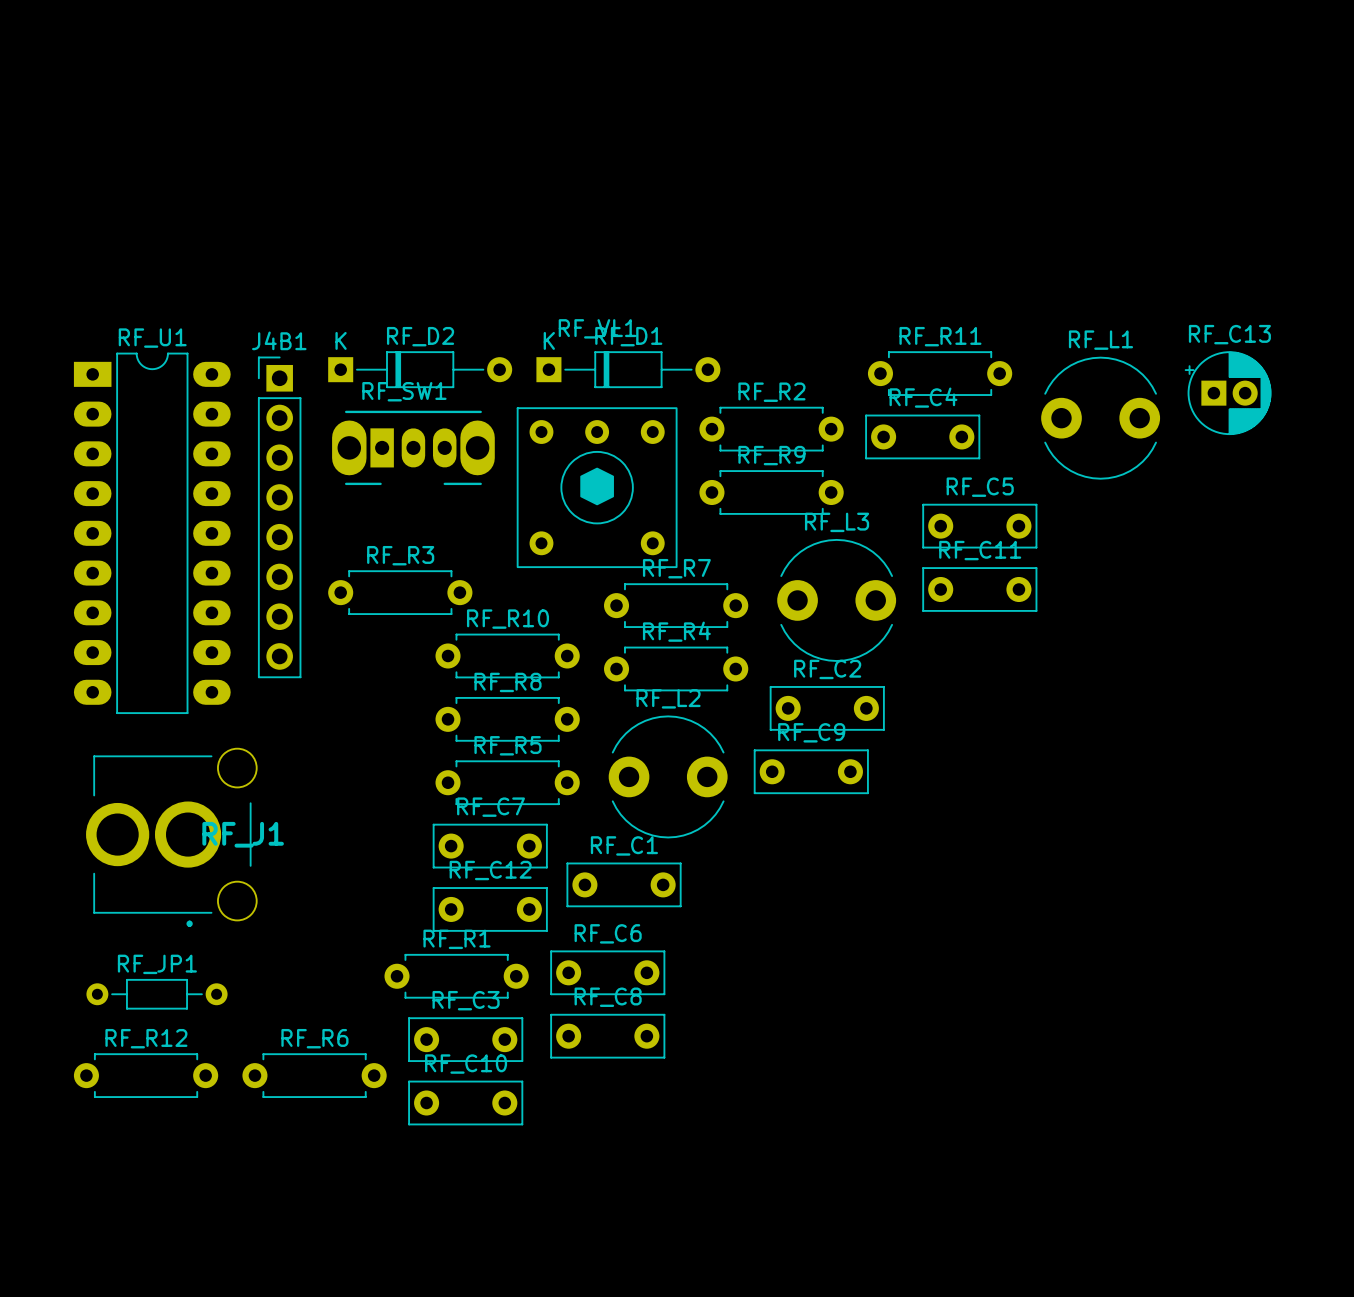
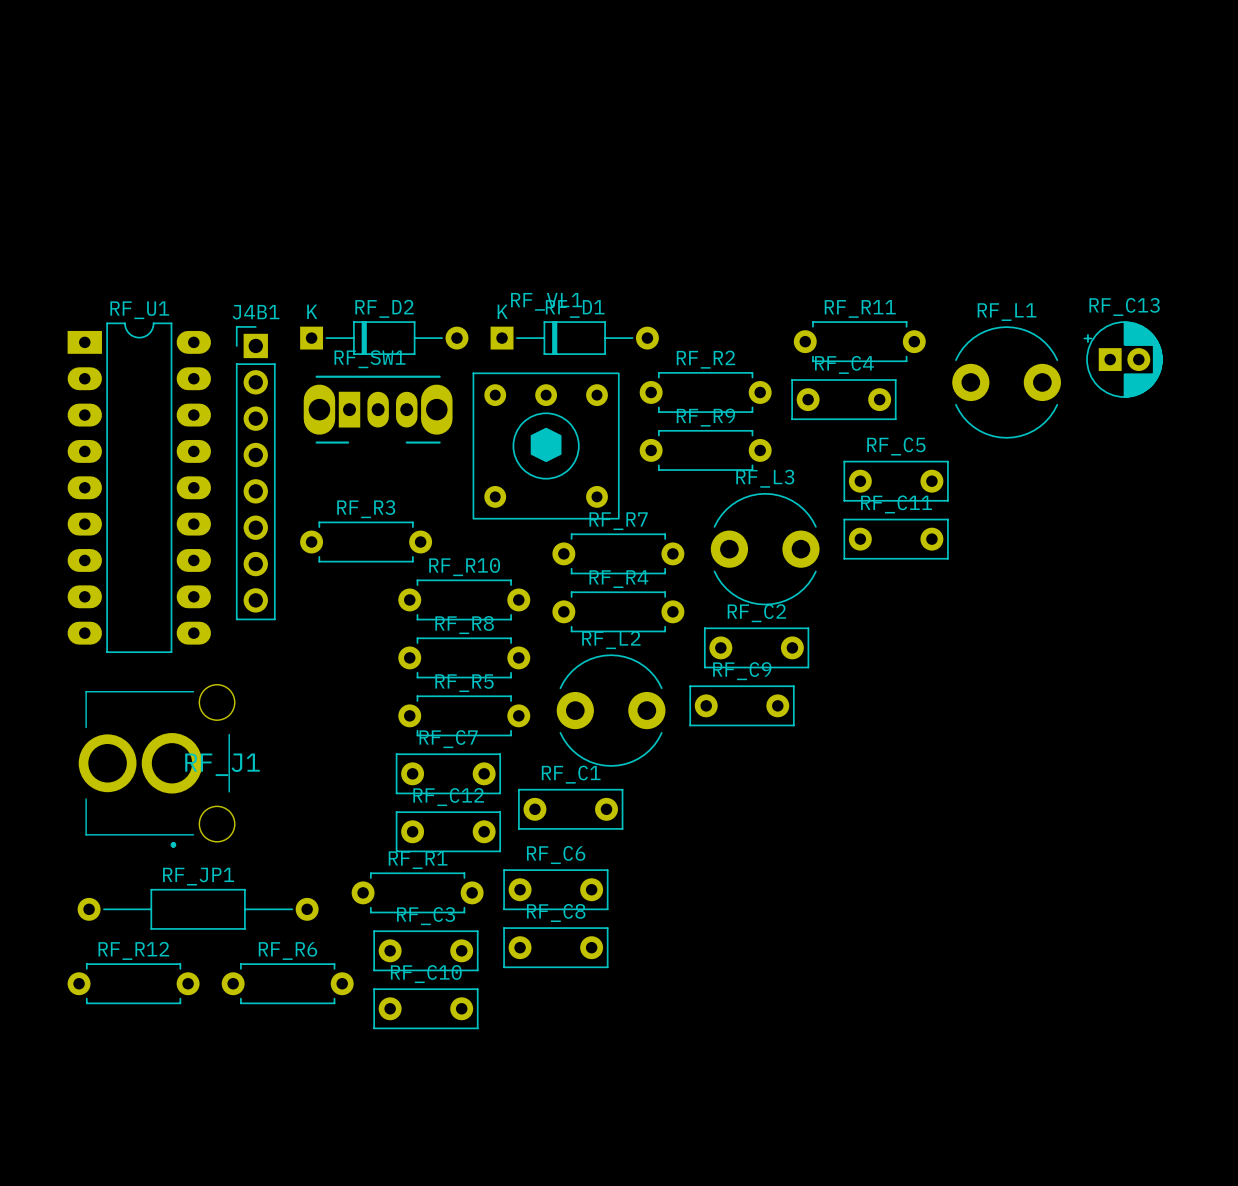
RF_JP1 footprint: [86, 978, 228, 1010] -> [77, 888, 319, 930]

